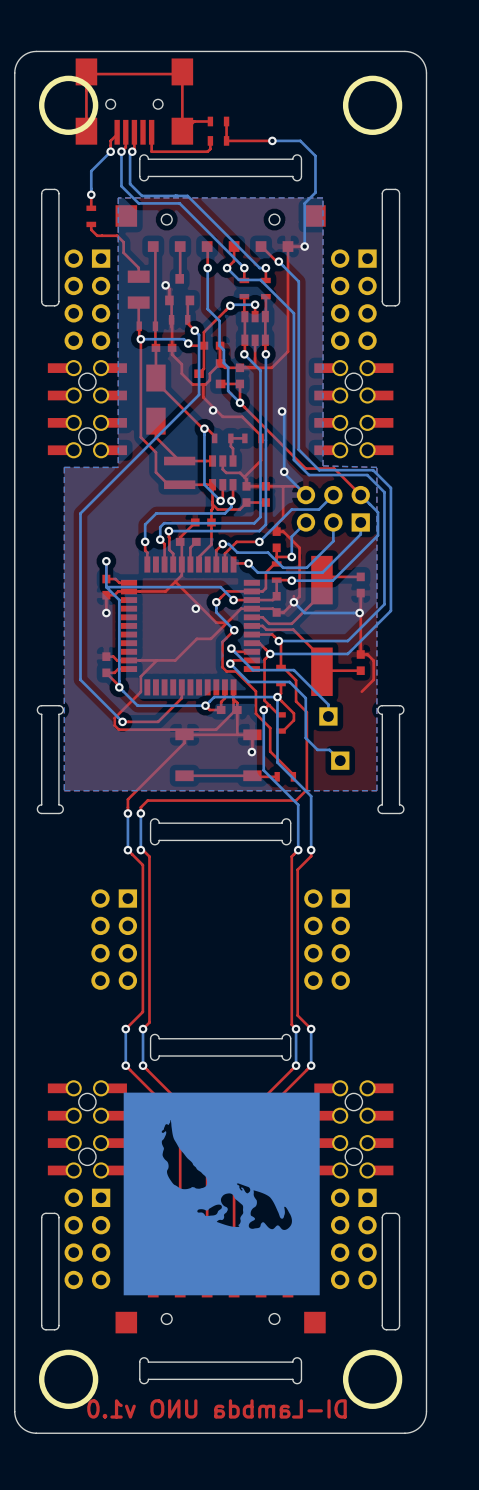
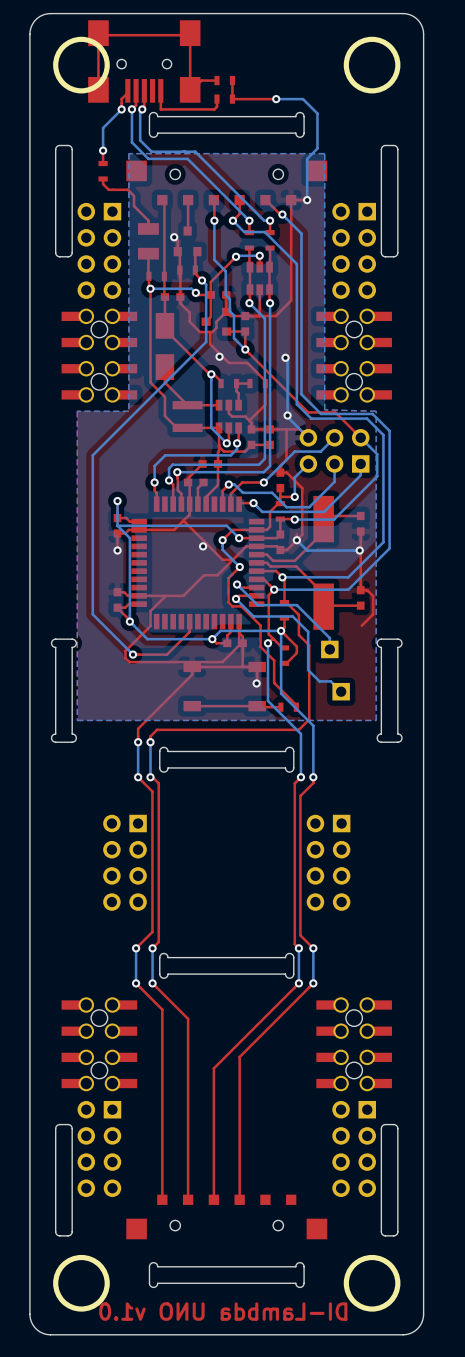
drawing: [123, 1092, 320, 1296] -> none

